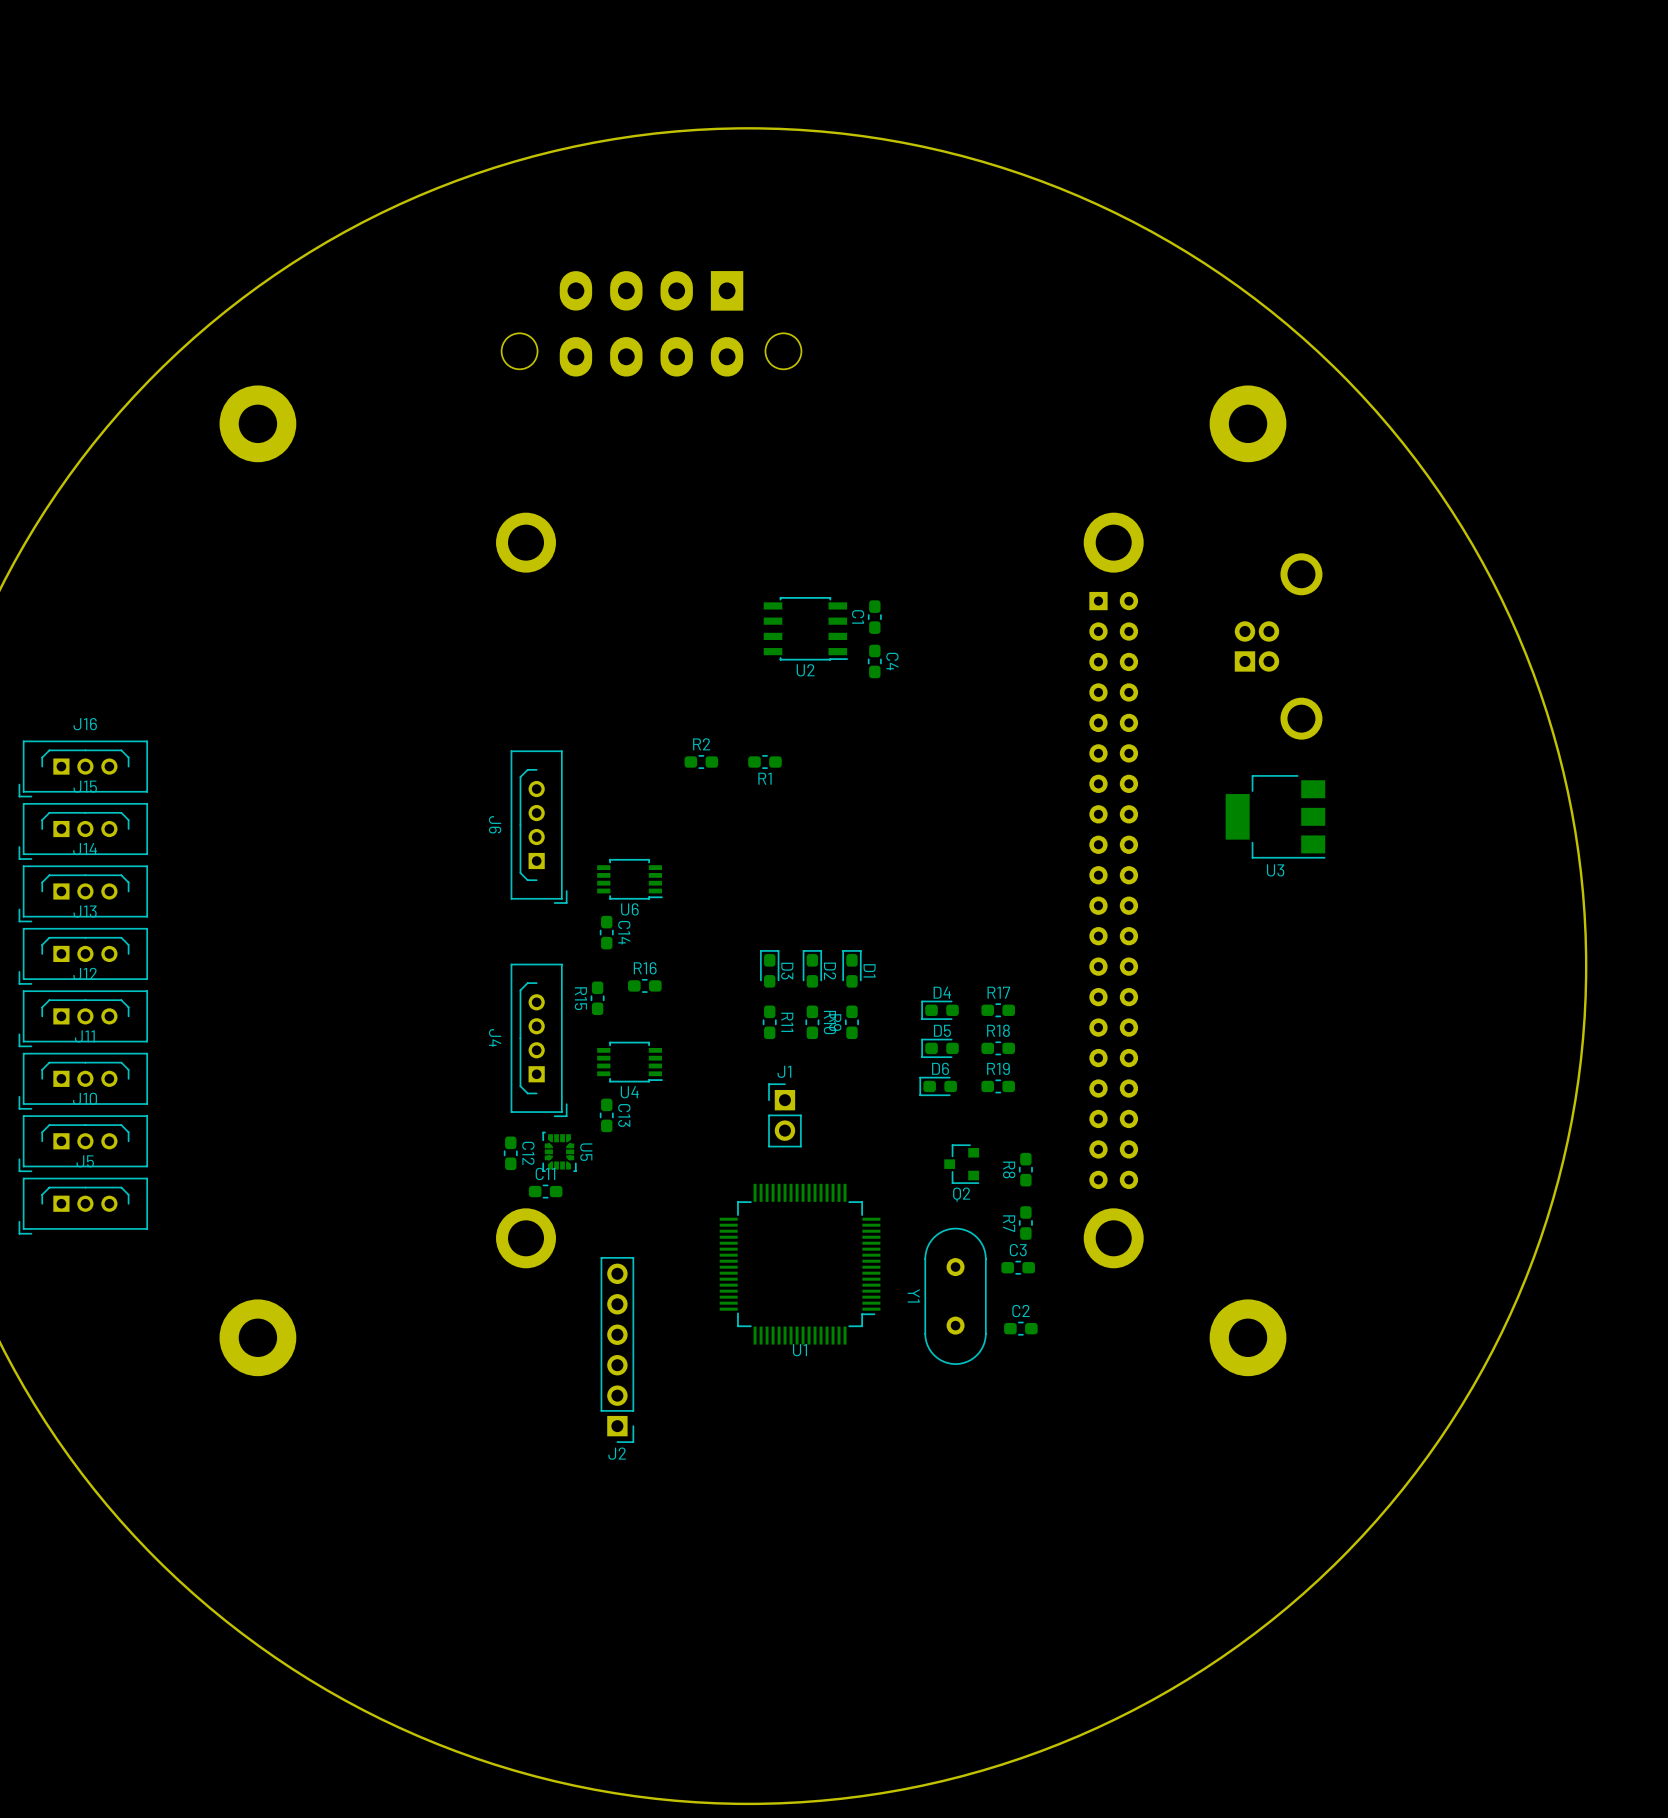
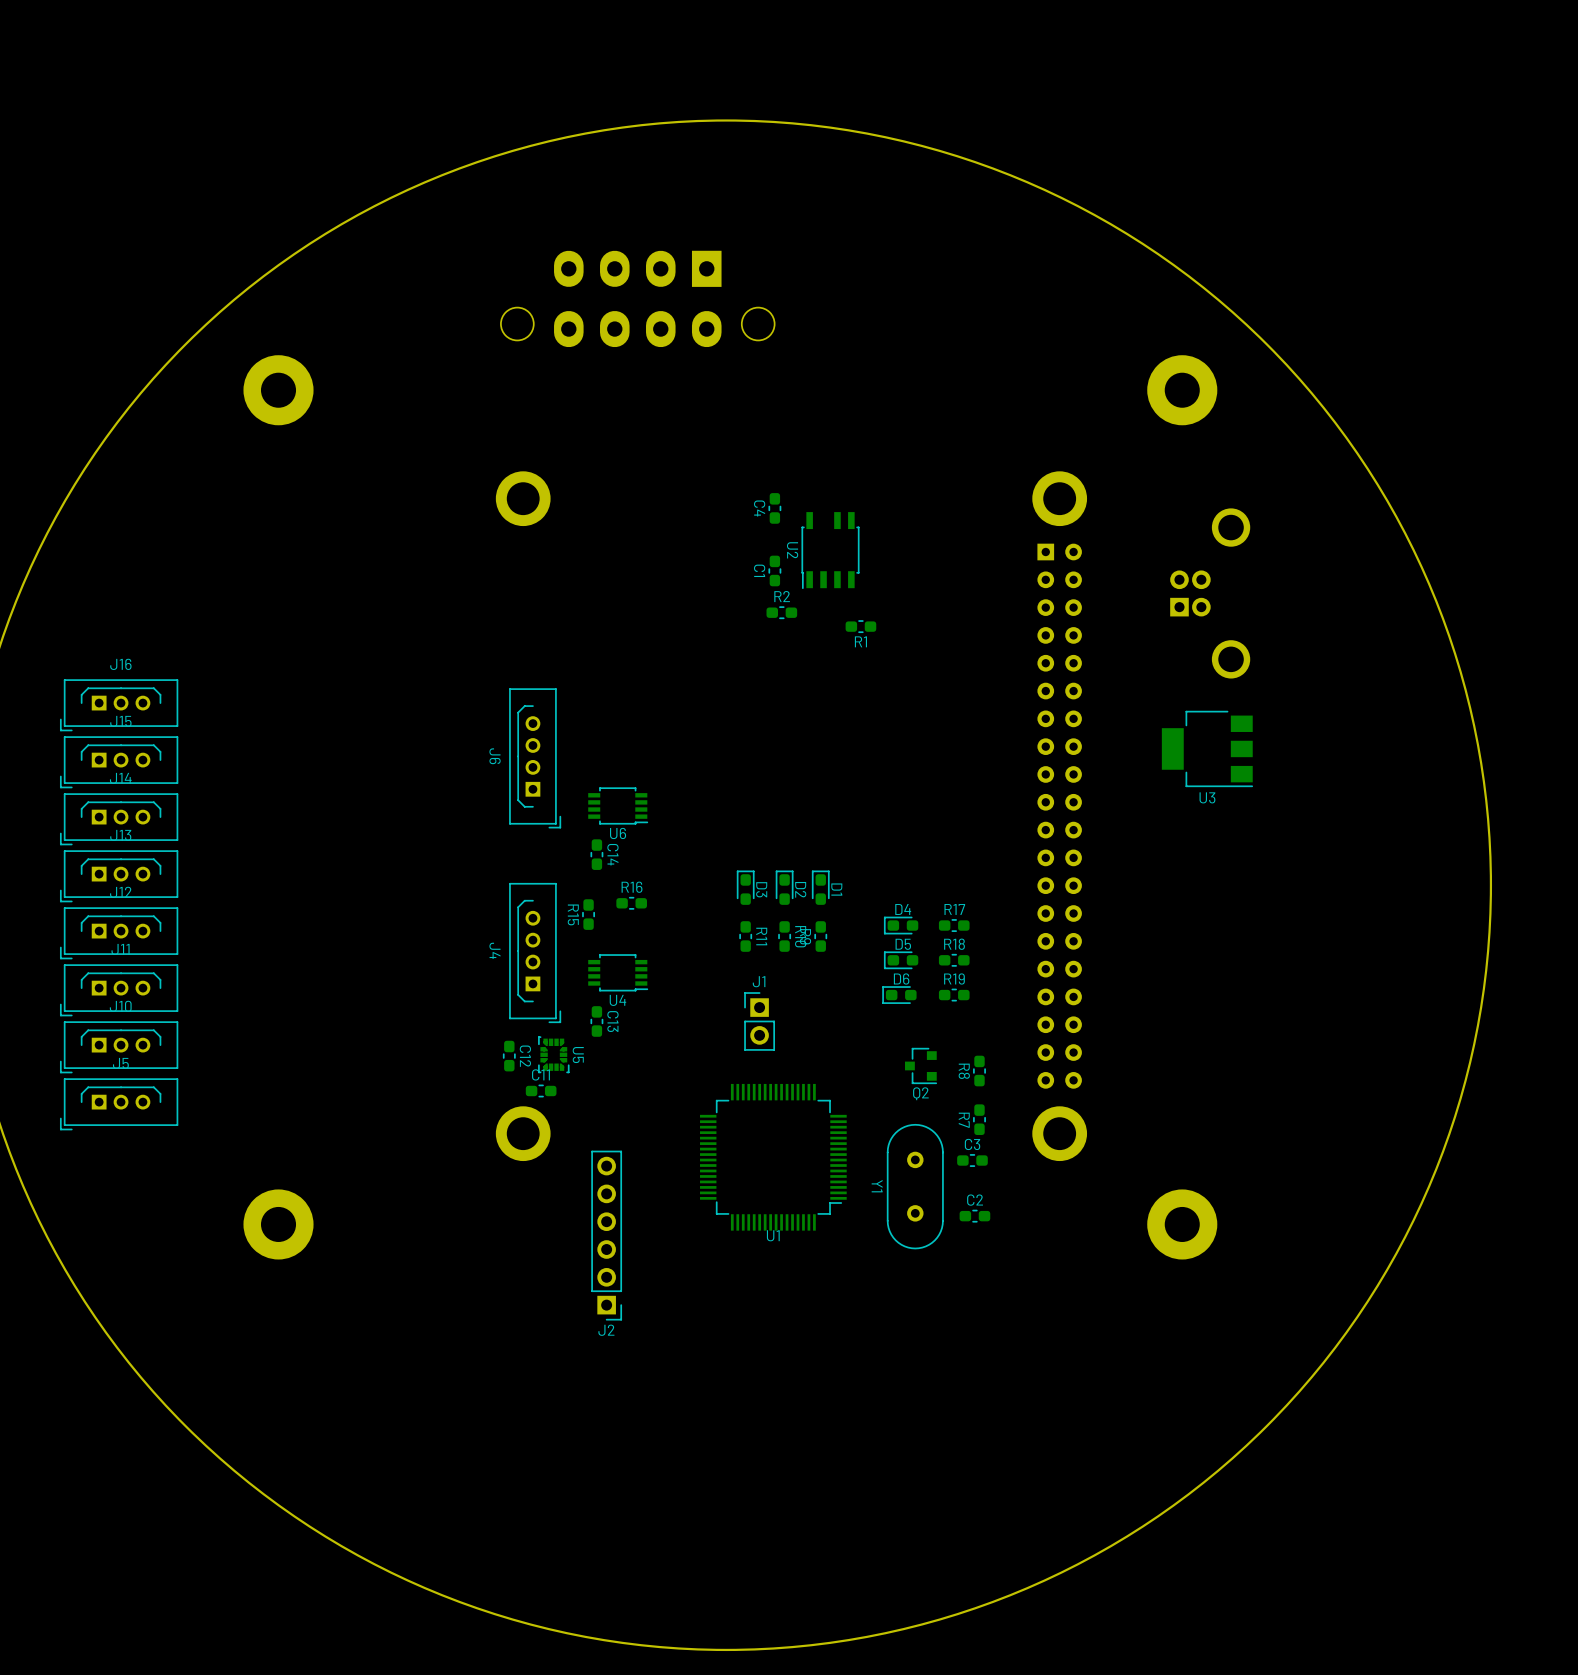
U2 footprint: [763, 597, 848, 661] -> [801, 512, 860, 589]
C1 position: (874, 617) -> (774, 570)
C4 position: (874, 661) -> (774, 508)
C4 name position: C4 (892, 661) -> C4 (759, 508)
U2 name position: U2 (805, 670) -> U2 (792, 550)
R2 position: (701, 762) -> (781, 612)
R1 position: (764, 762) -> (860, 626)

